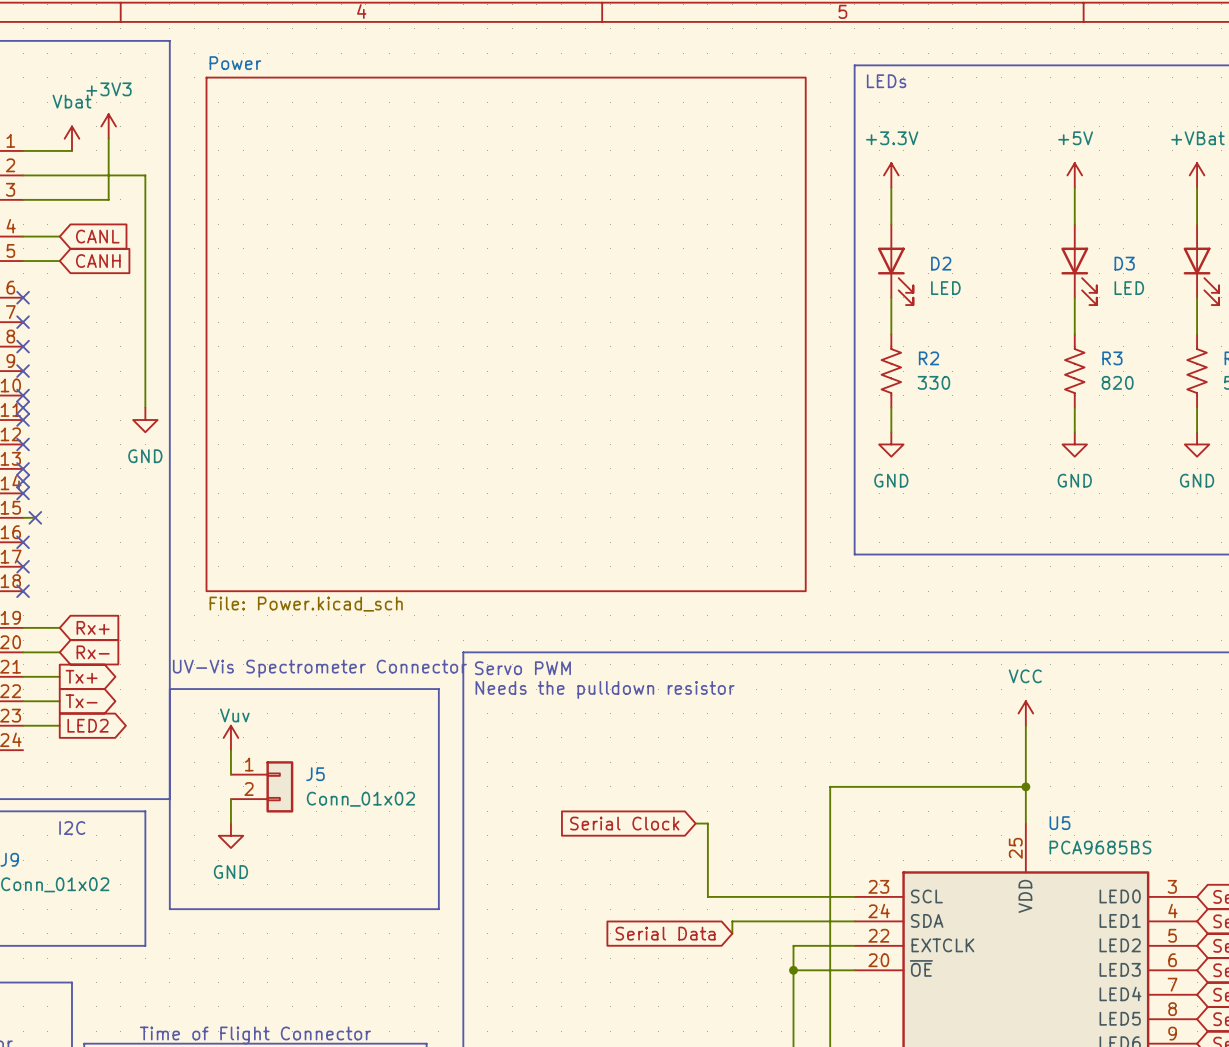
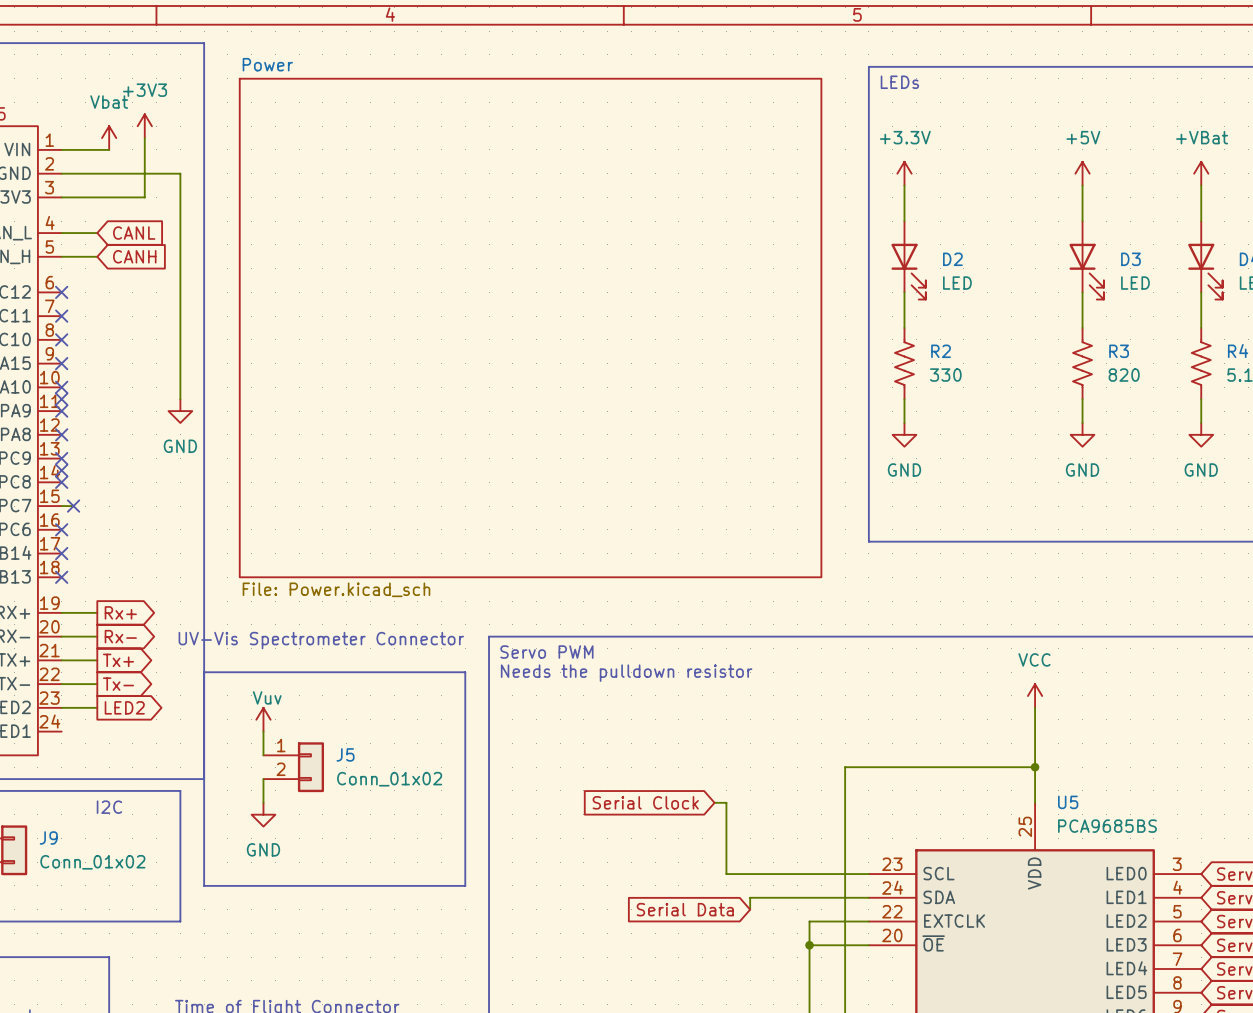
global label shape: input (93, 627) -> output (120, 612)
global label shape: input (93, 652) -> output (120, 636)
text position: UV-Vis Spectrometer Connector (319, 668) -> UV-Vis Spectrometer Connector (321, 640)

